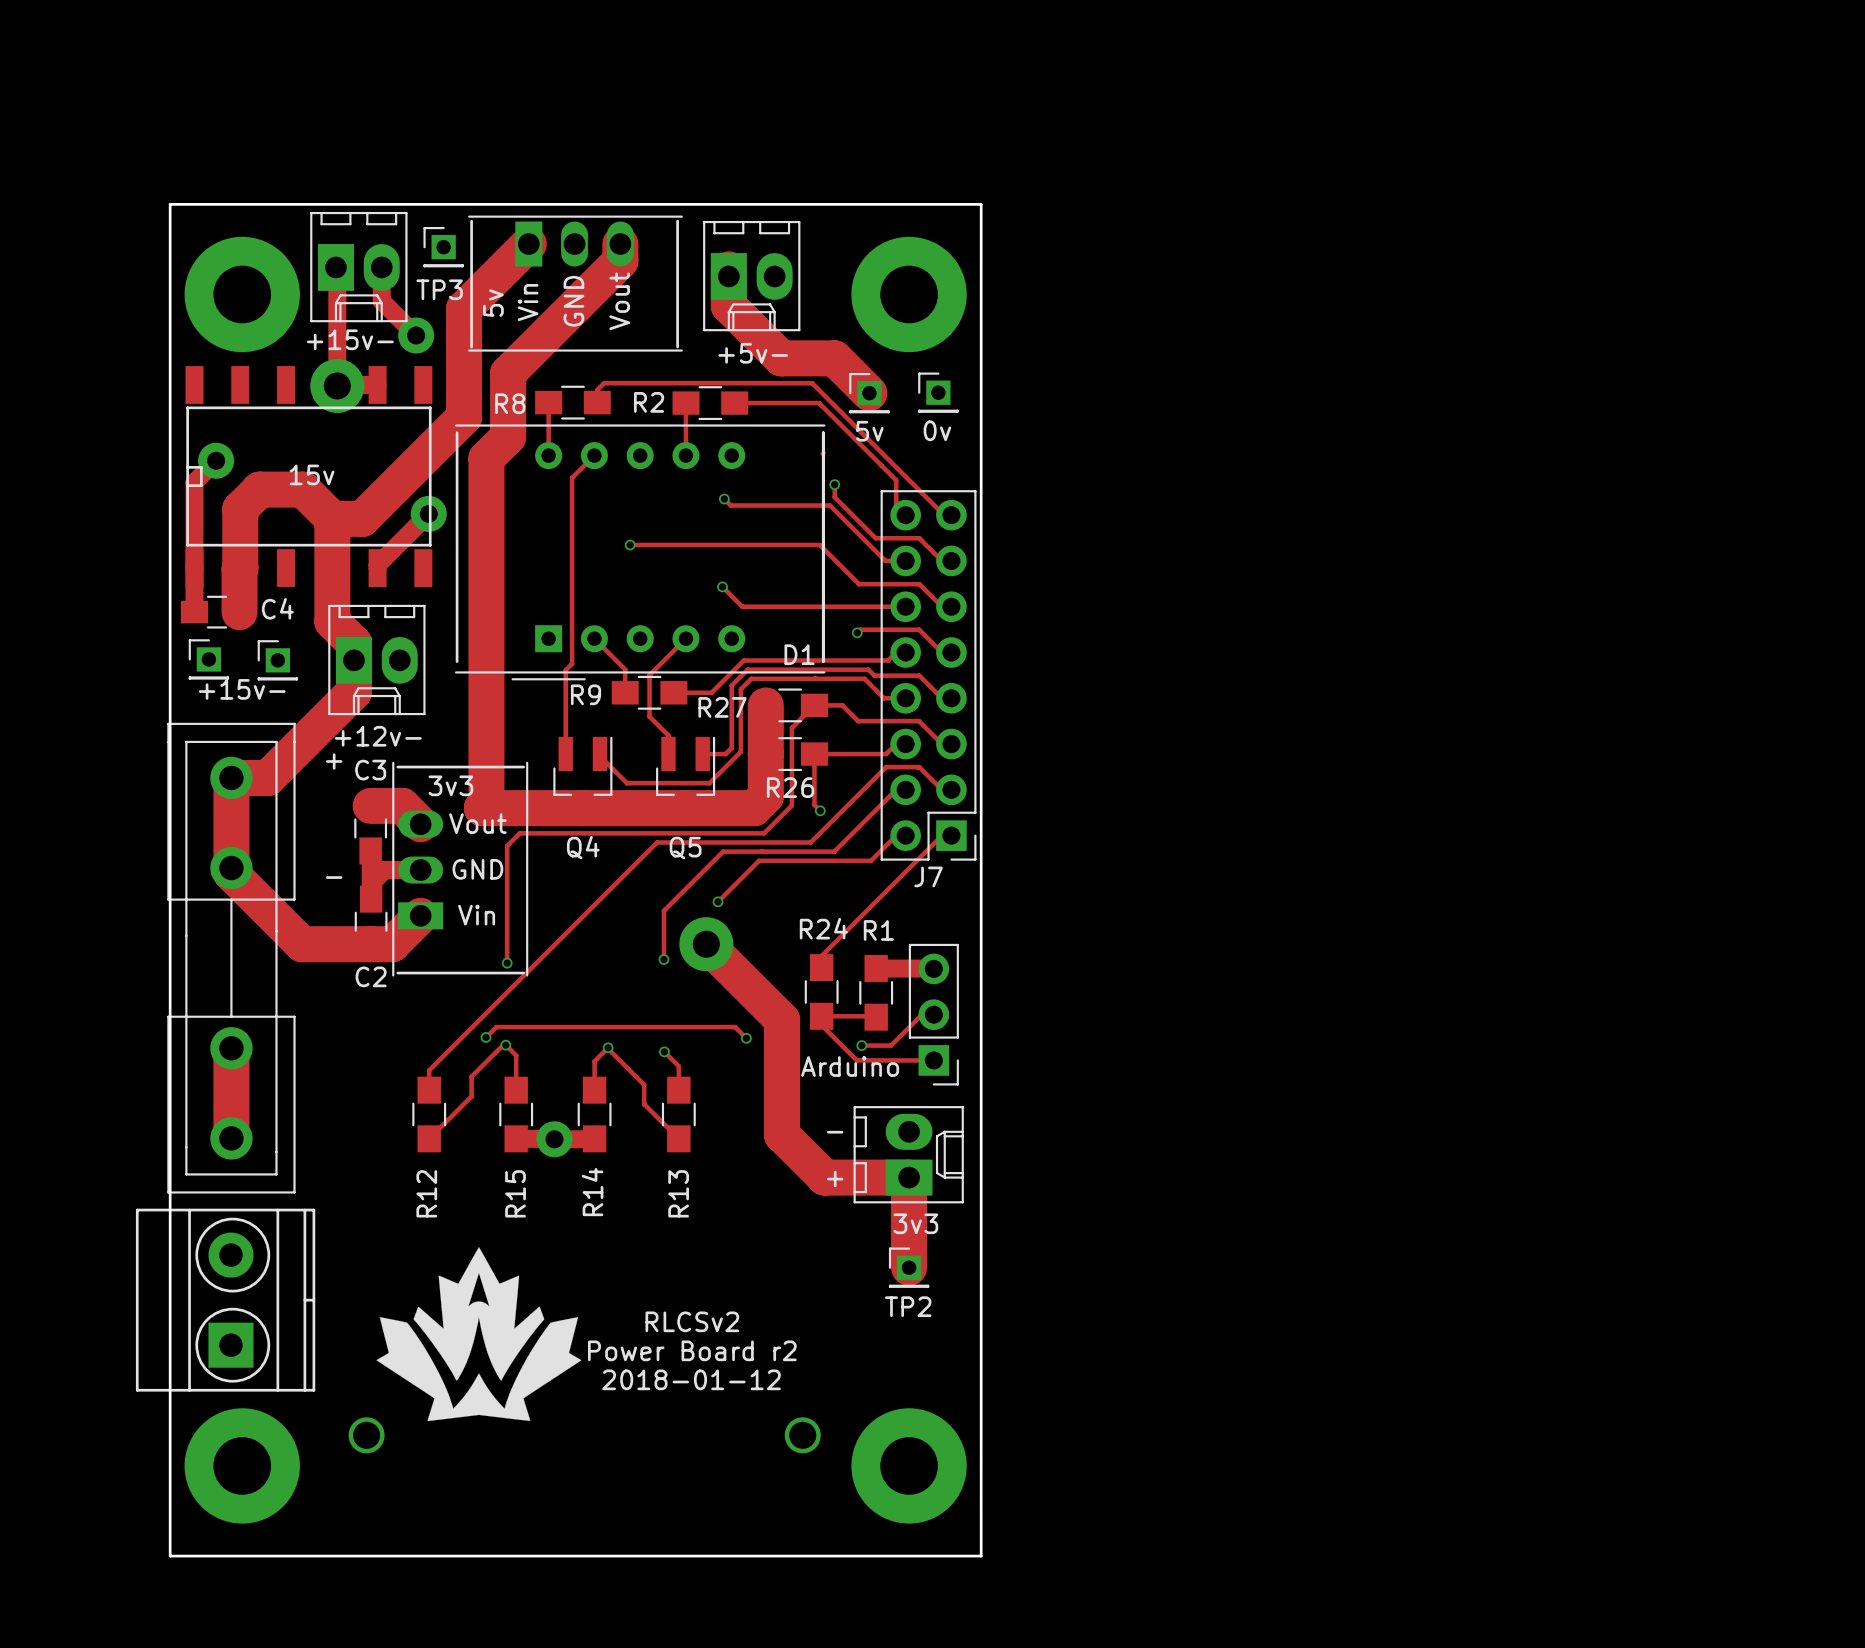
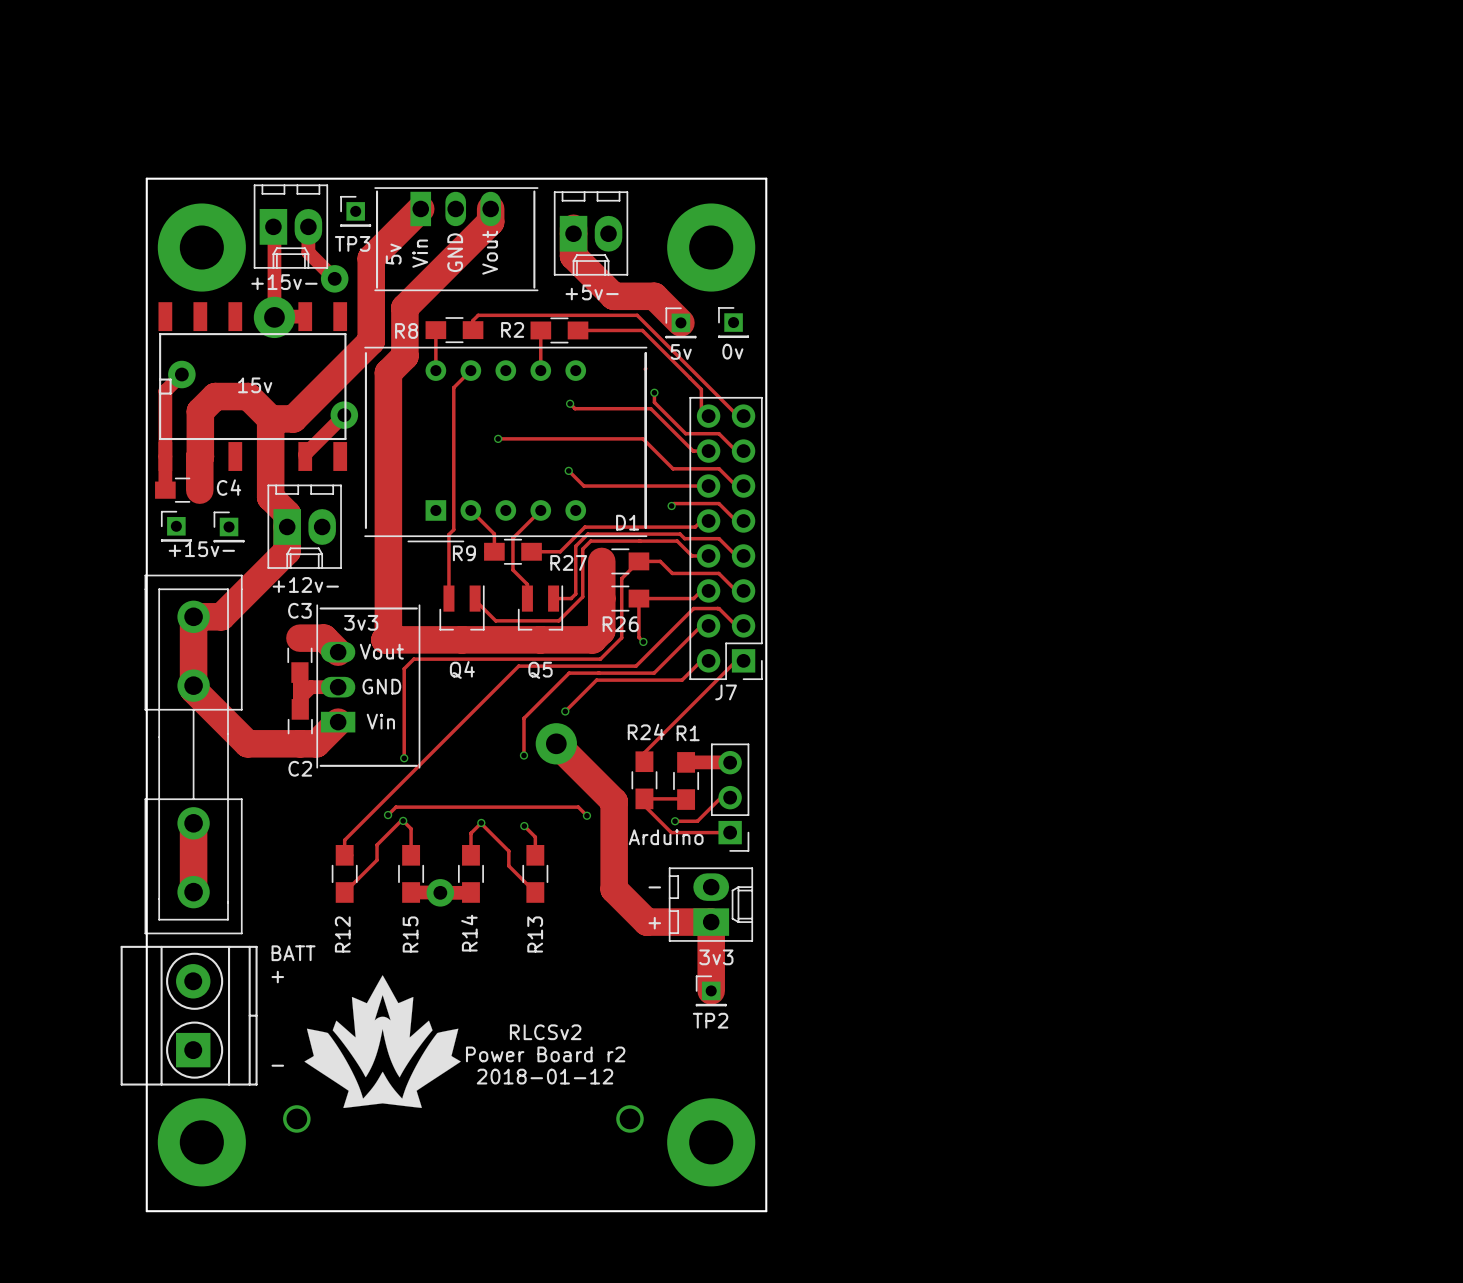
text: + (334, 761) -> none
text: - (334, 877) -> none
text: none -> BATT (293, 953)
text: none -> + (277, 977)
text: none -> - (277, 1065)

